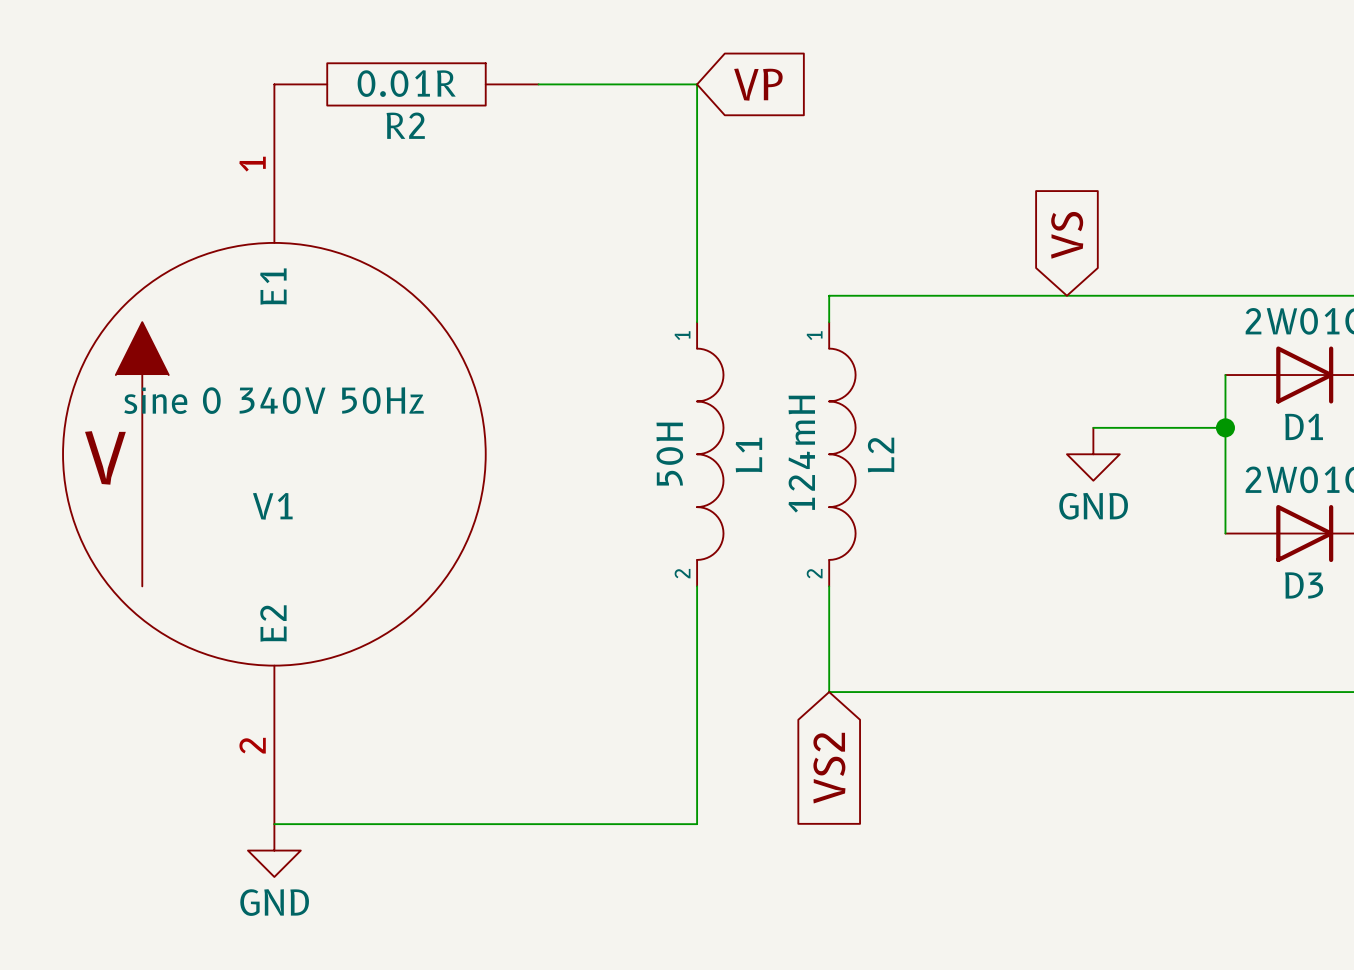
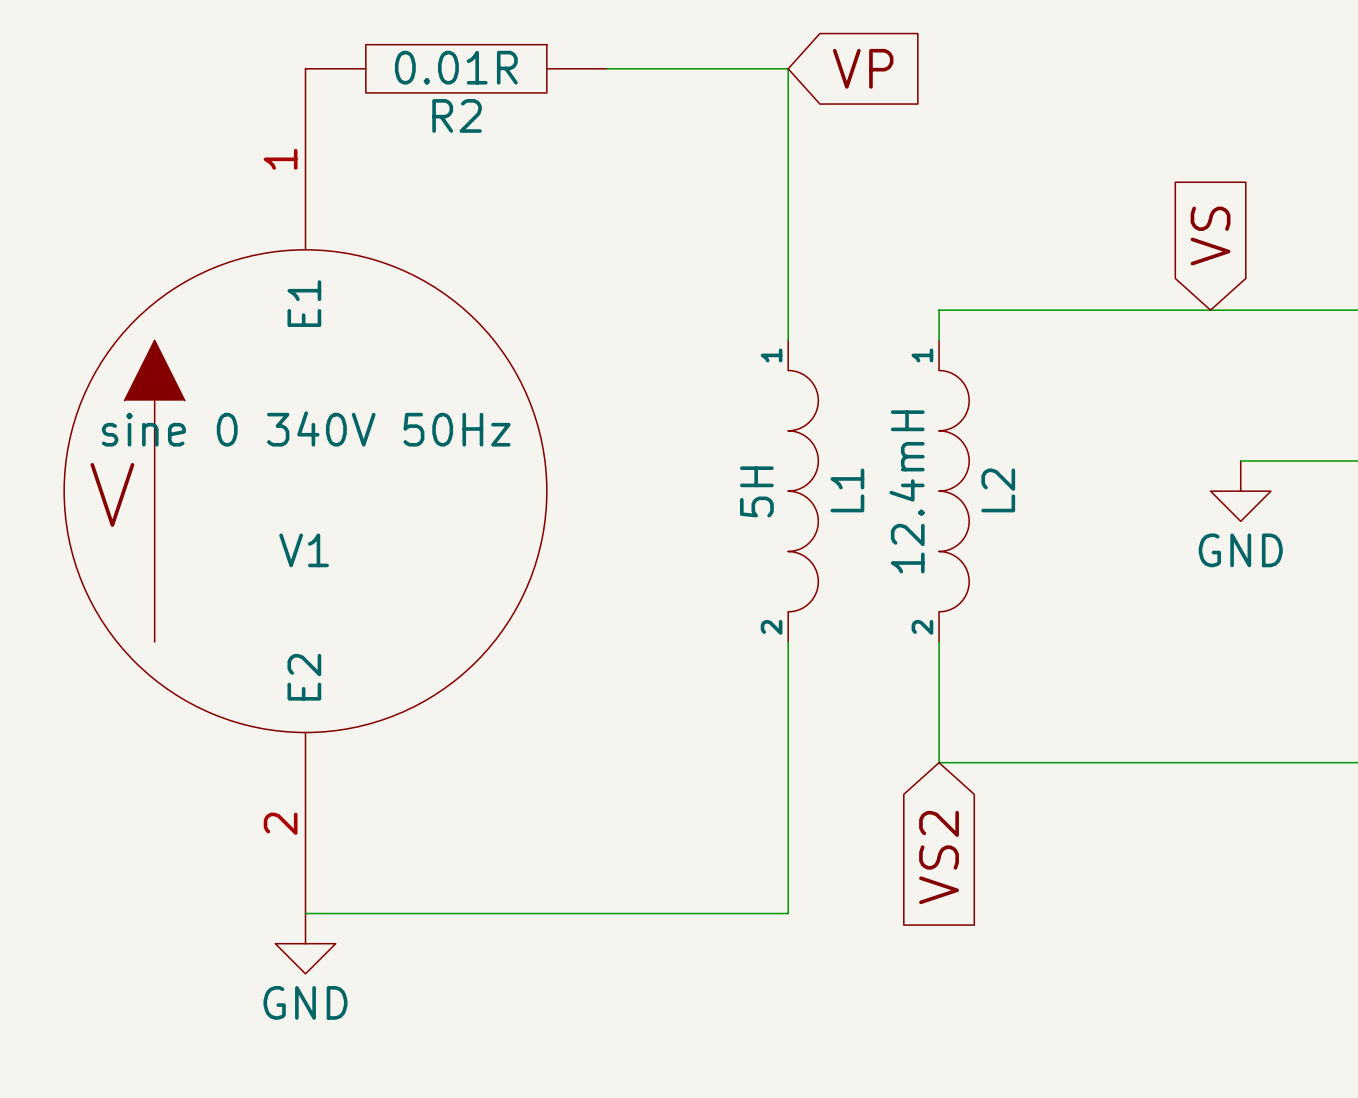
L1 value: 50H (669, 454) -> 5H (756, 491)
L2 value: 124mH (801, 454) -> 12.4mH (907, 491)

